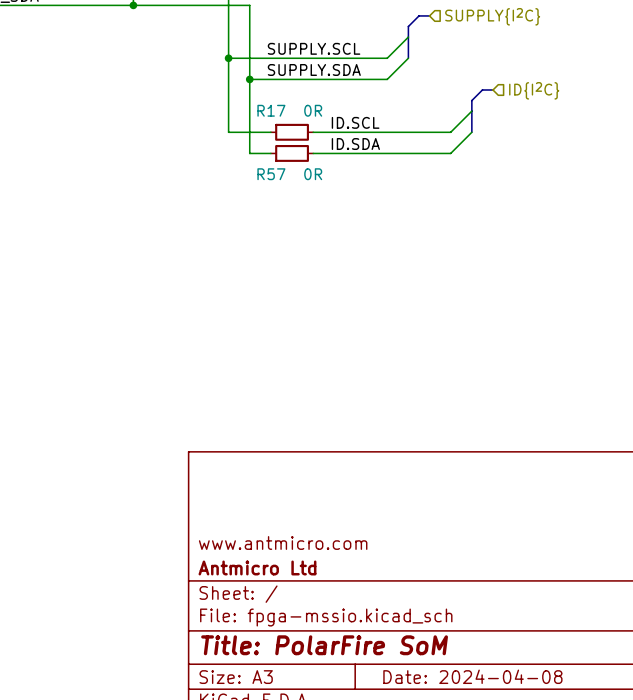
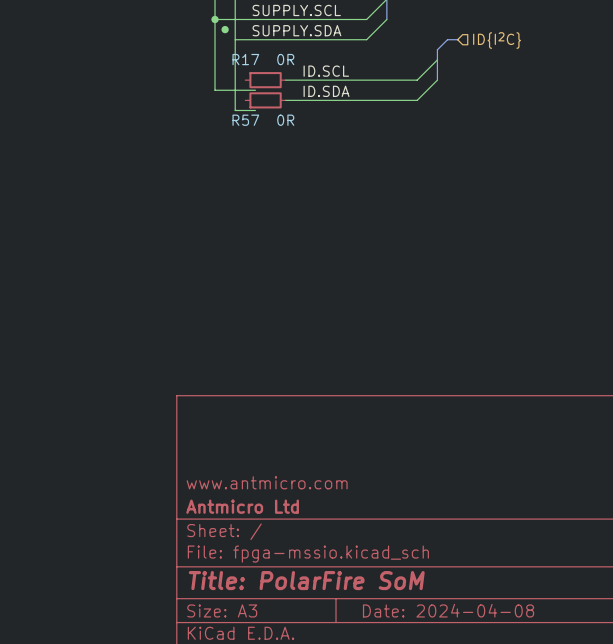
junction position: (249, 79) -> (225, 29)
bus: (493, 89) (482, 89) (471, 100) (471, 132) -> (457, 39) (447, 39) (437, 49) (437, 80)
hierarchical label position: ID{I2C} (534, 90) -> ID{I2C} (497, 40)
wire: (471, 111) (461, 121) -> none
label position: ID.SCL (355, 122) -> ID.SCL (326, 71)
R17 position: (292, 132) -> (265, 80)
wire: (313, 132) (450, 132) -> (285, 100) (417, 100) (427, 90)
wire: (471, 132) (450, 153) (313, 153) -> (437, 59) (417, 80) (285, 80)
label position: ID.SDA (355, 144) -> ID.SDA (326, 91)
R57 position: (292, 153) -> (265, 100)

